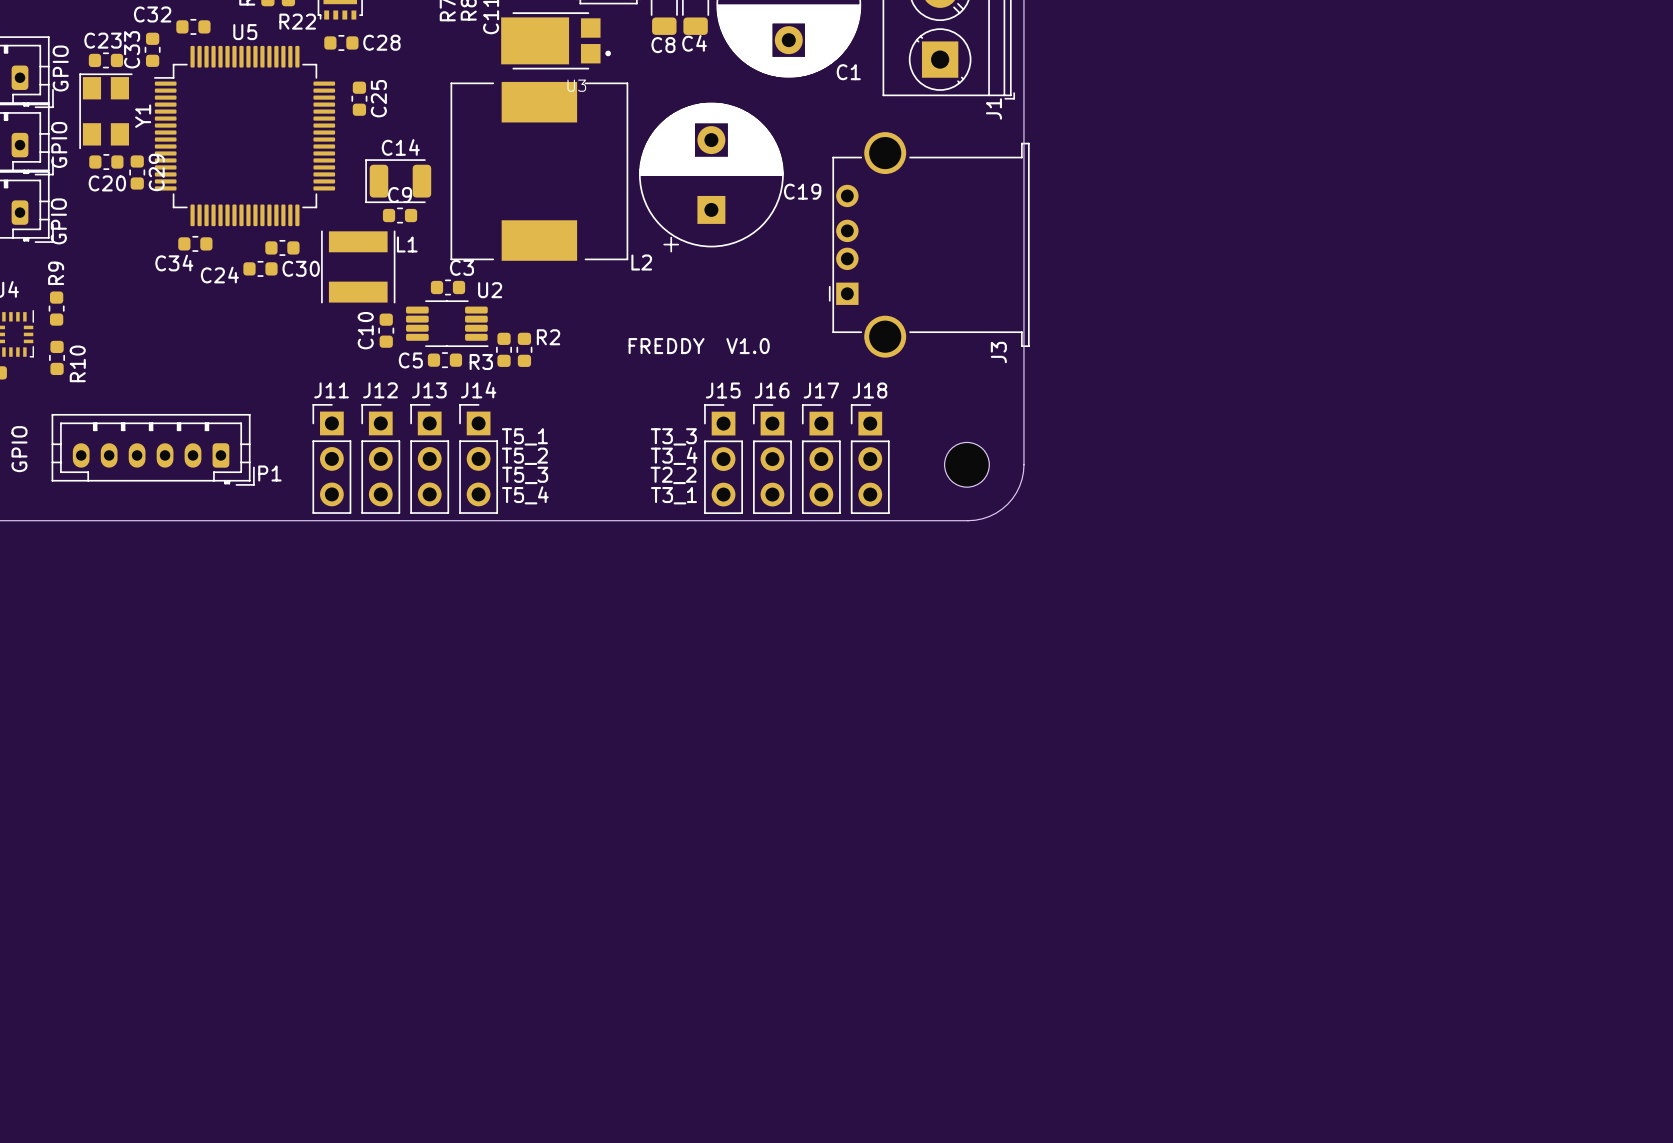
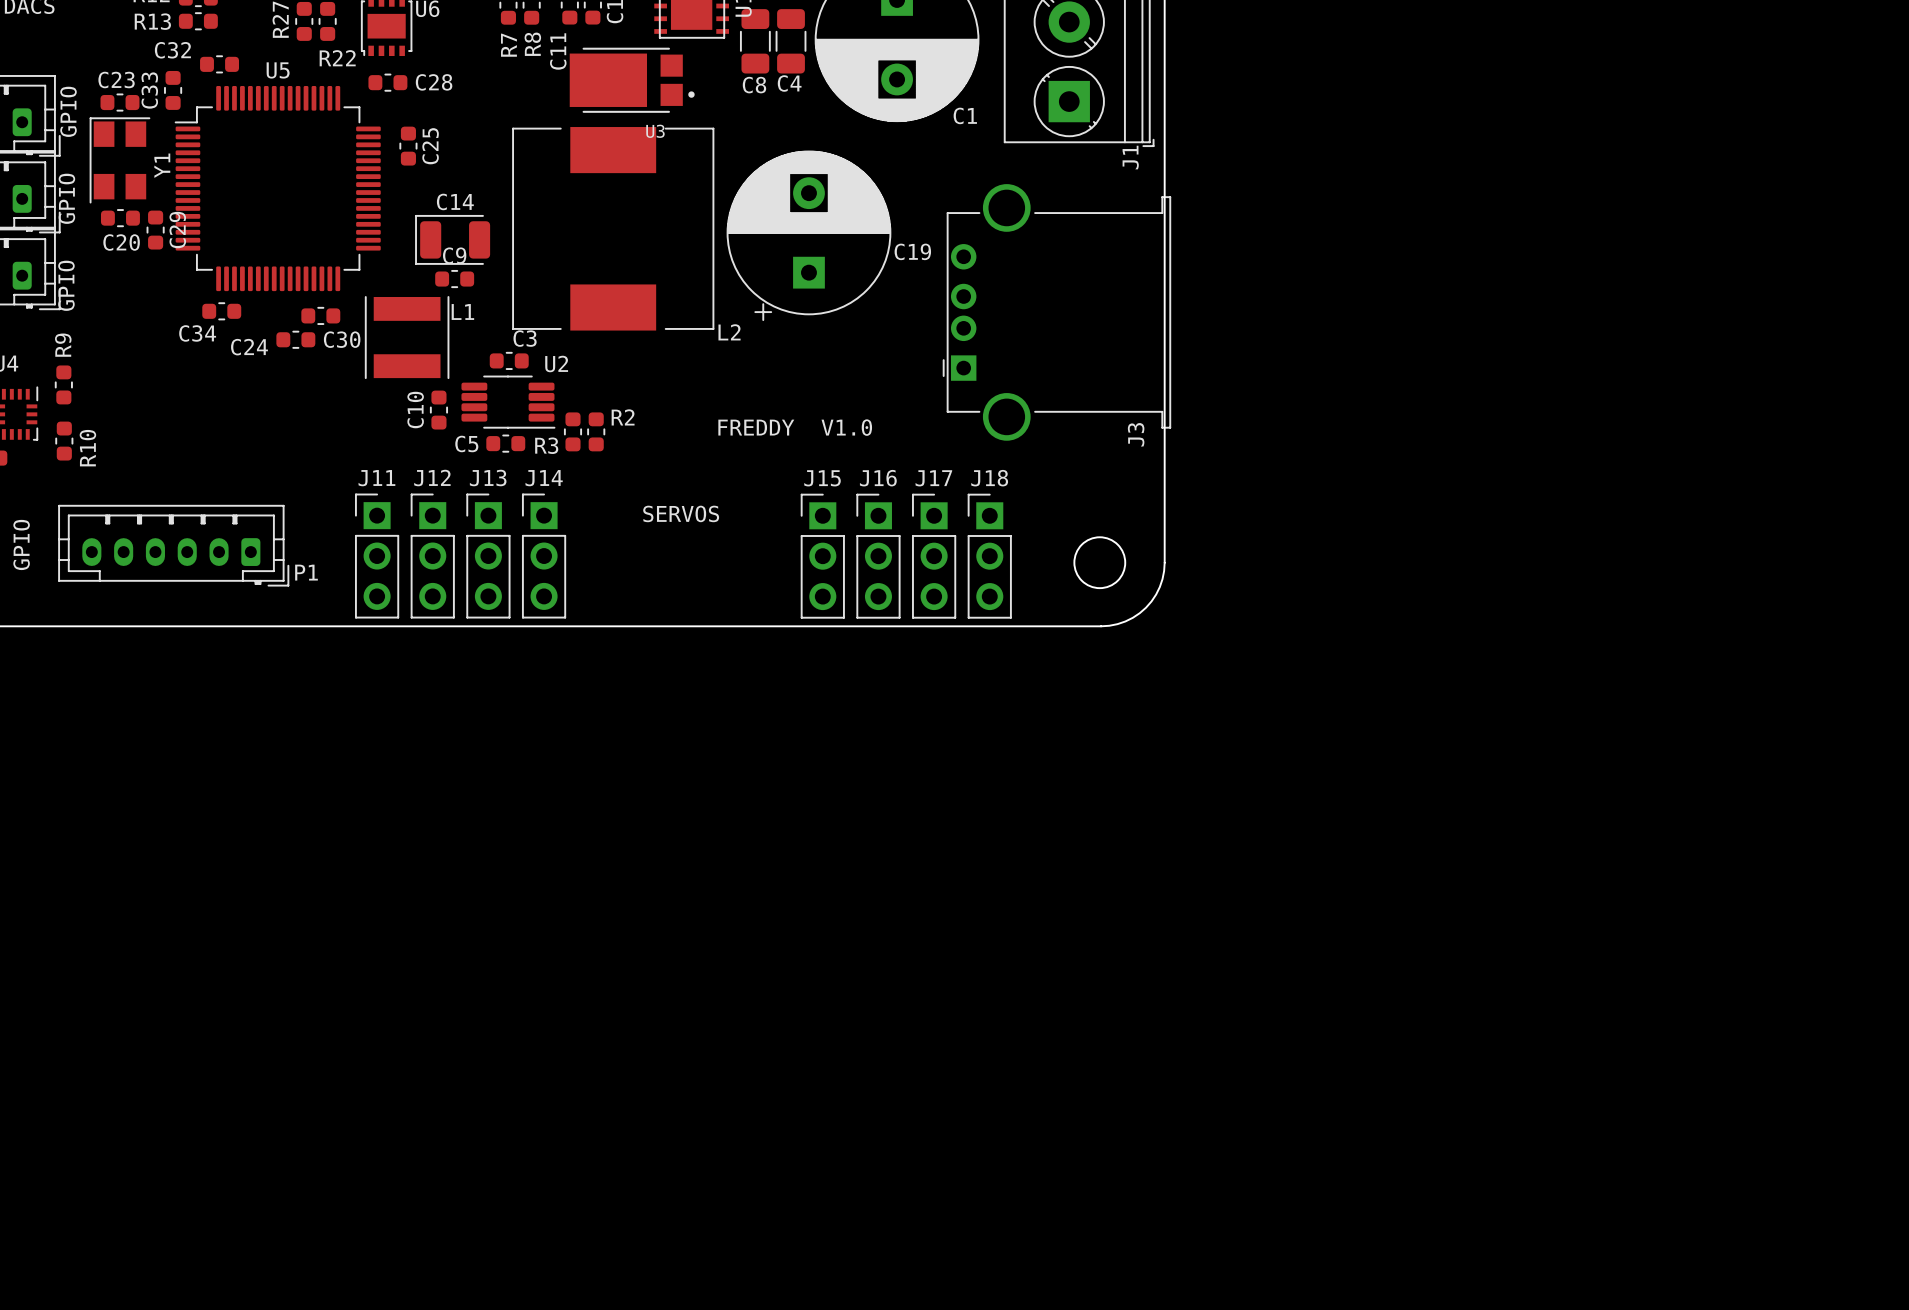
text: none -> SERVOS (681, 513)
text: T5_1 (524, 436) -> none
text: T3_3 (673, 436) -> none
text: T3_4 (674, 455) -> none
text: T5_2 (524, 456) -> none
text: T5_3 (525, 475) -> none
text: T2_2 (673, 475) -> none
text: T5_4 (525, 495) -> none
text: T3_1 (673, 495) -> none

